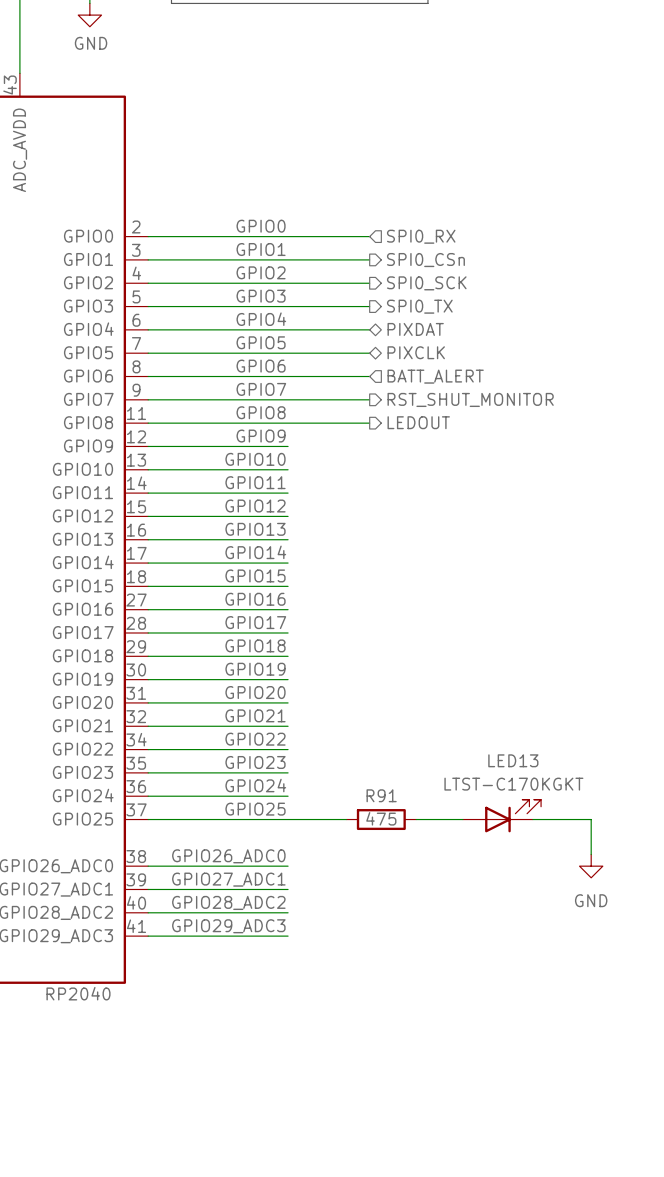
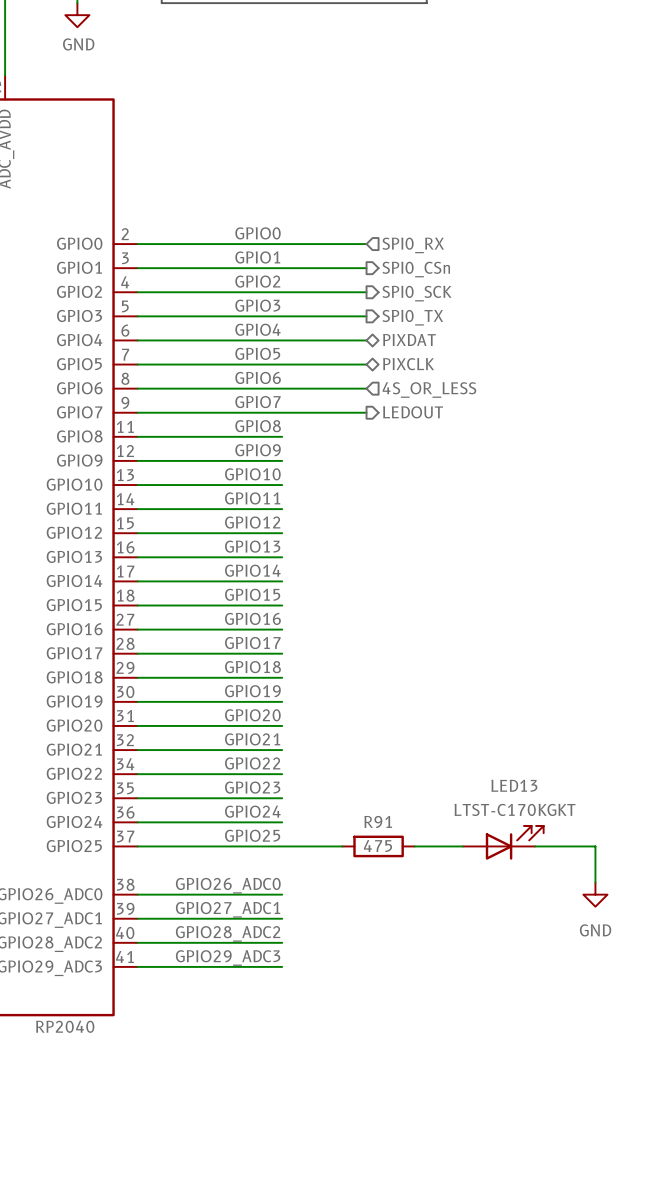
hierarchical label: BATT_ALERT (435, 376) -> 4S_OR_LESS (429, 389)
hierarchical label: RST_SHUT_MONITOR (470, 399) -> LEDOUT (413, 412)
hierarchical label: LEDOUT (418, 422) -> none
wire: (288, 423) (369, 423) -> none

